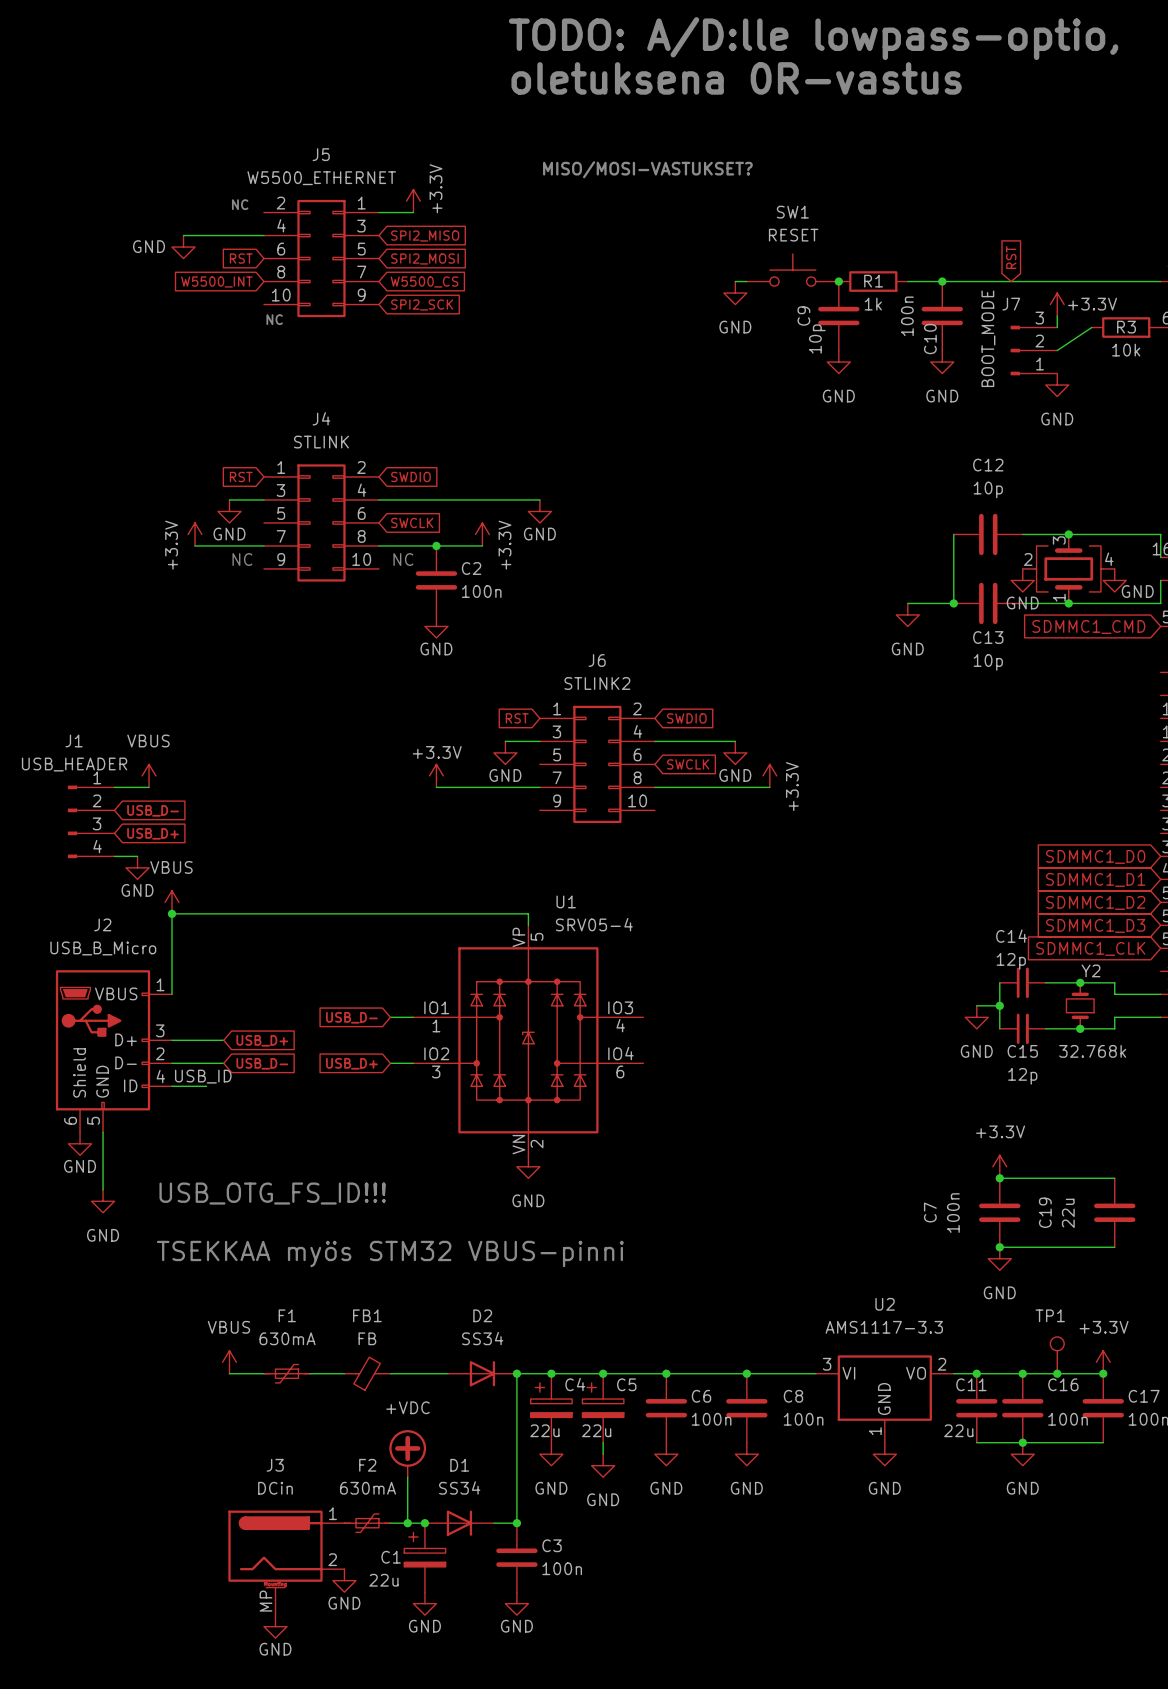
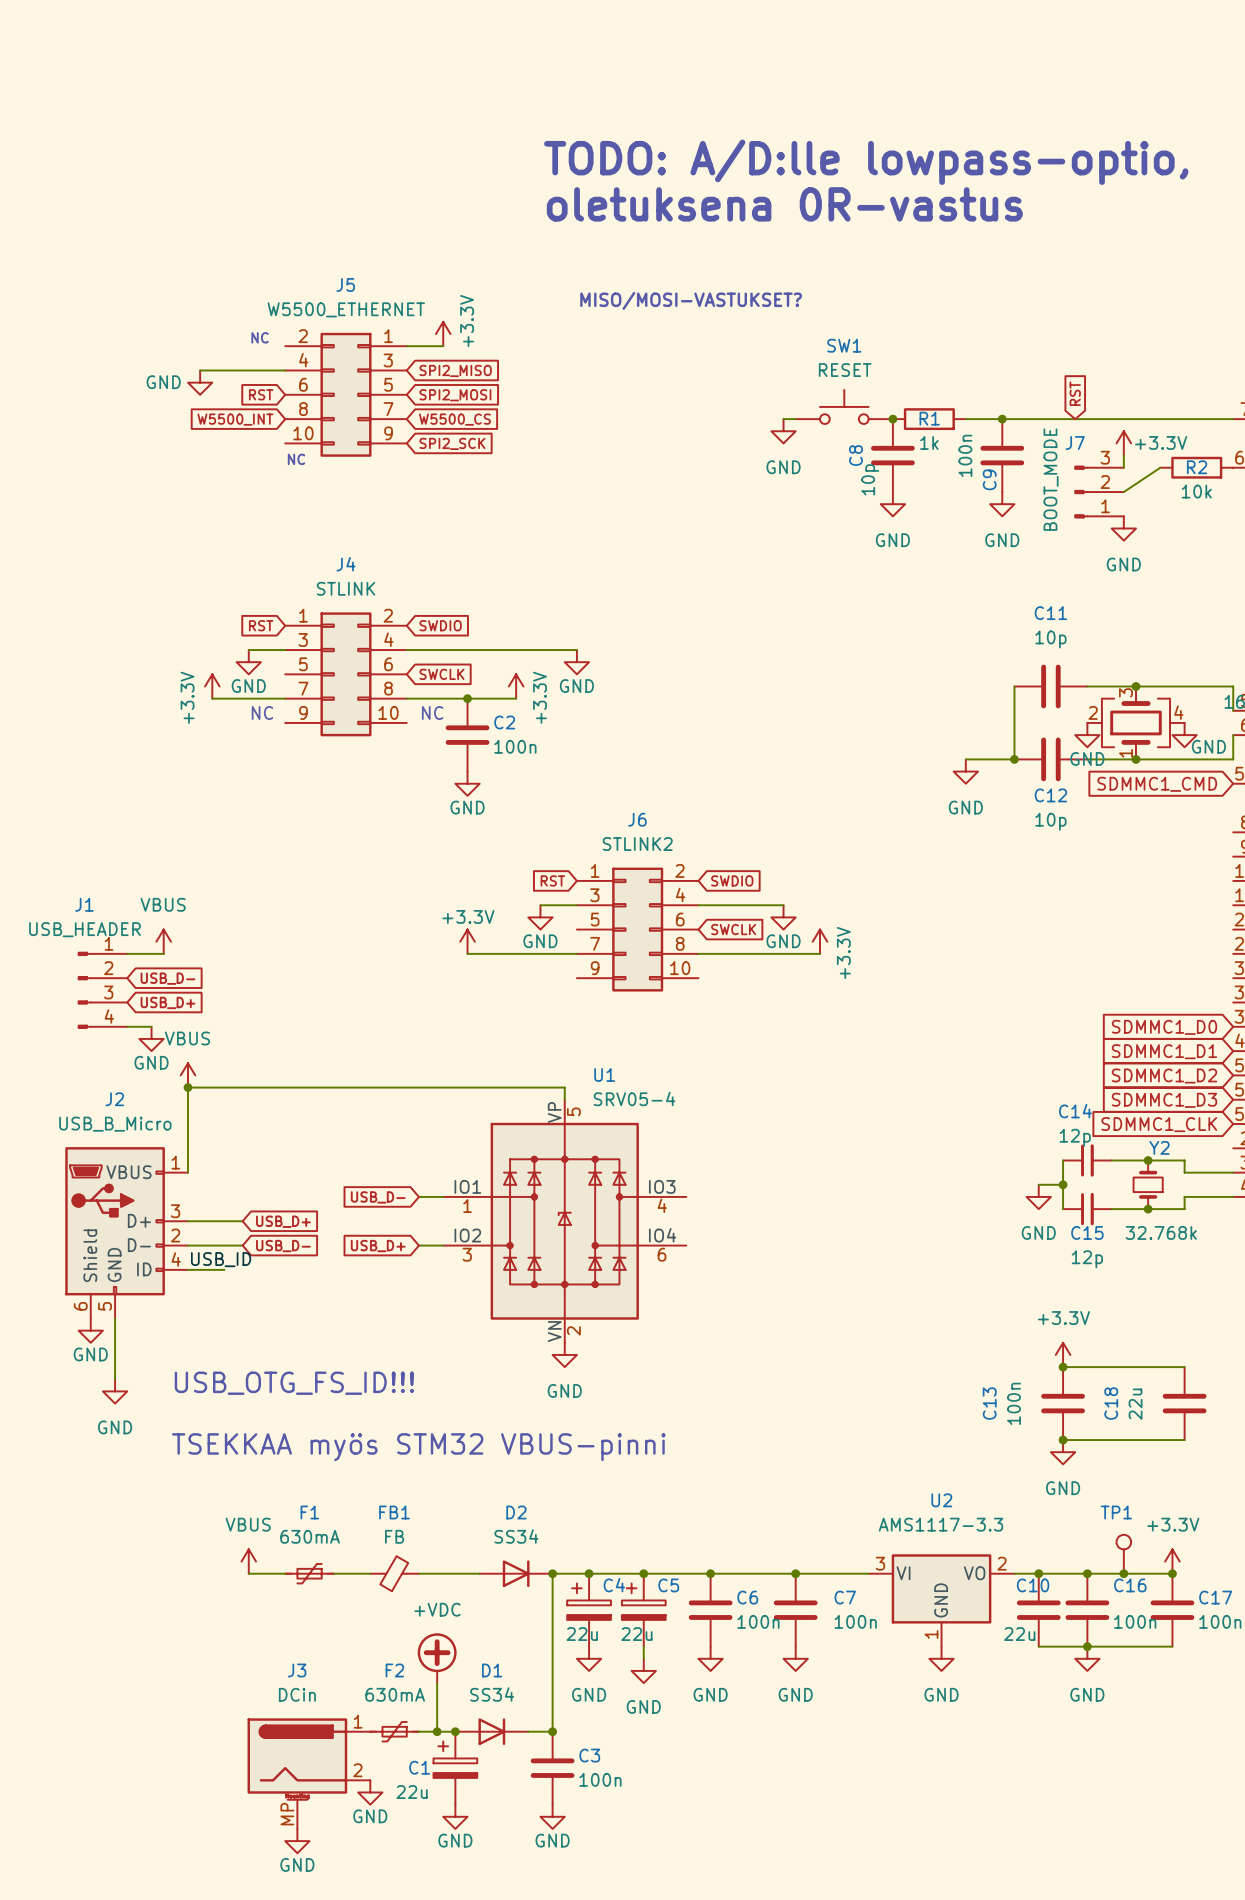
C9 name: C9 (803, 316) -> C8 (856, 455)
R3 name: R3 (1126, 327) -> R2 (1197, 467)
C10 name: C10 (930, 339) -> C9 (989, 479)
C12 name: C12 (988, 465) -> C11 (1050, 613)
C13 name: C13 (988, 637) -> C12 (1050, 795)
C7 name: C7 (930, 1212) -> C13 (989, 1403)
C19 name: C19 (1045, 1212) -> C18 (1111, 1403)
C11 name: C11 (971, 1384) -> C10 (1033, 1585)
C8 name: C8 (793, 1396) -> C7 (845, 1597)

